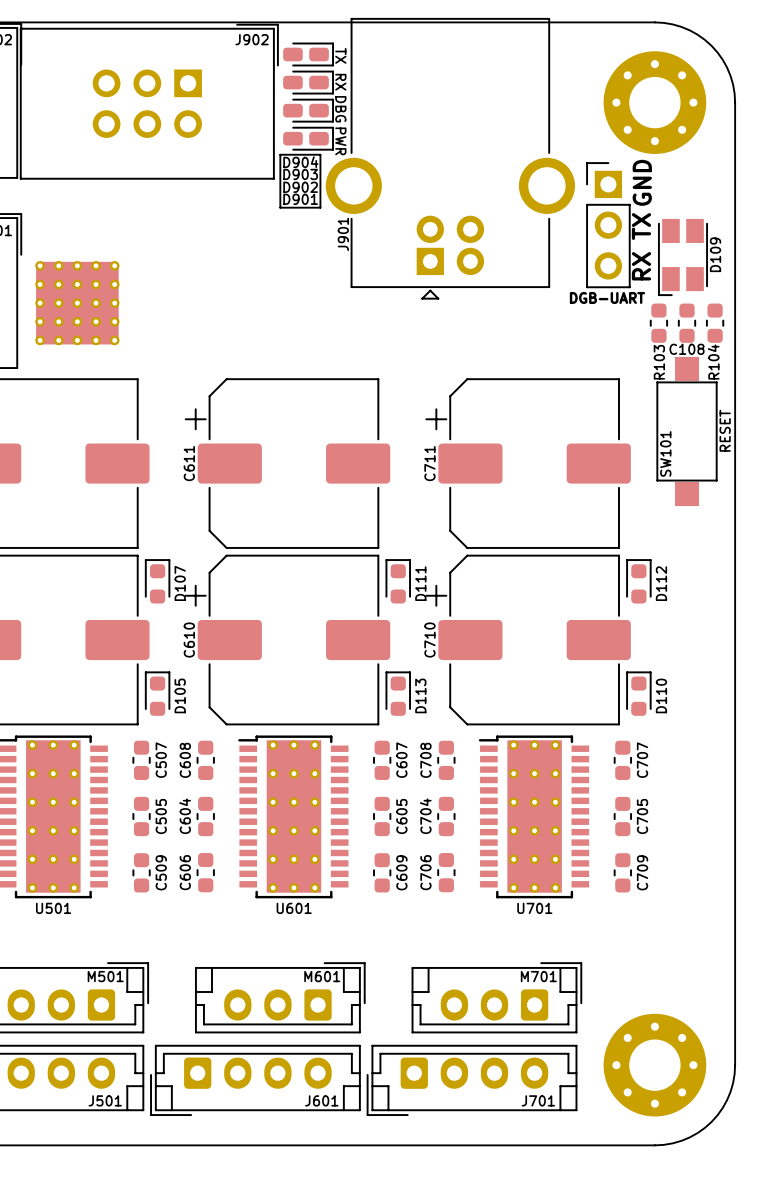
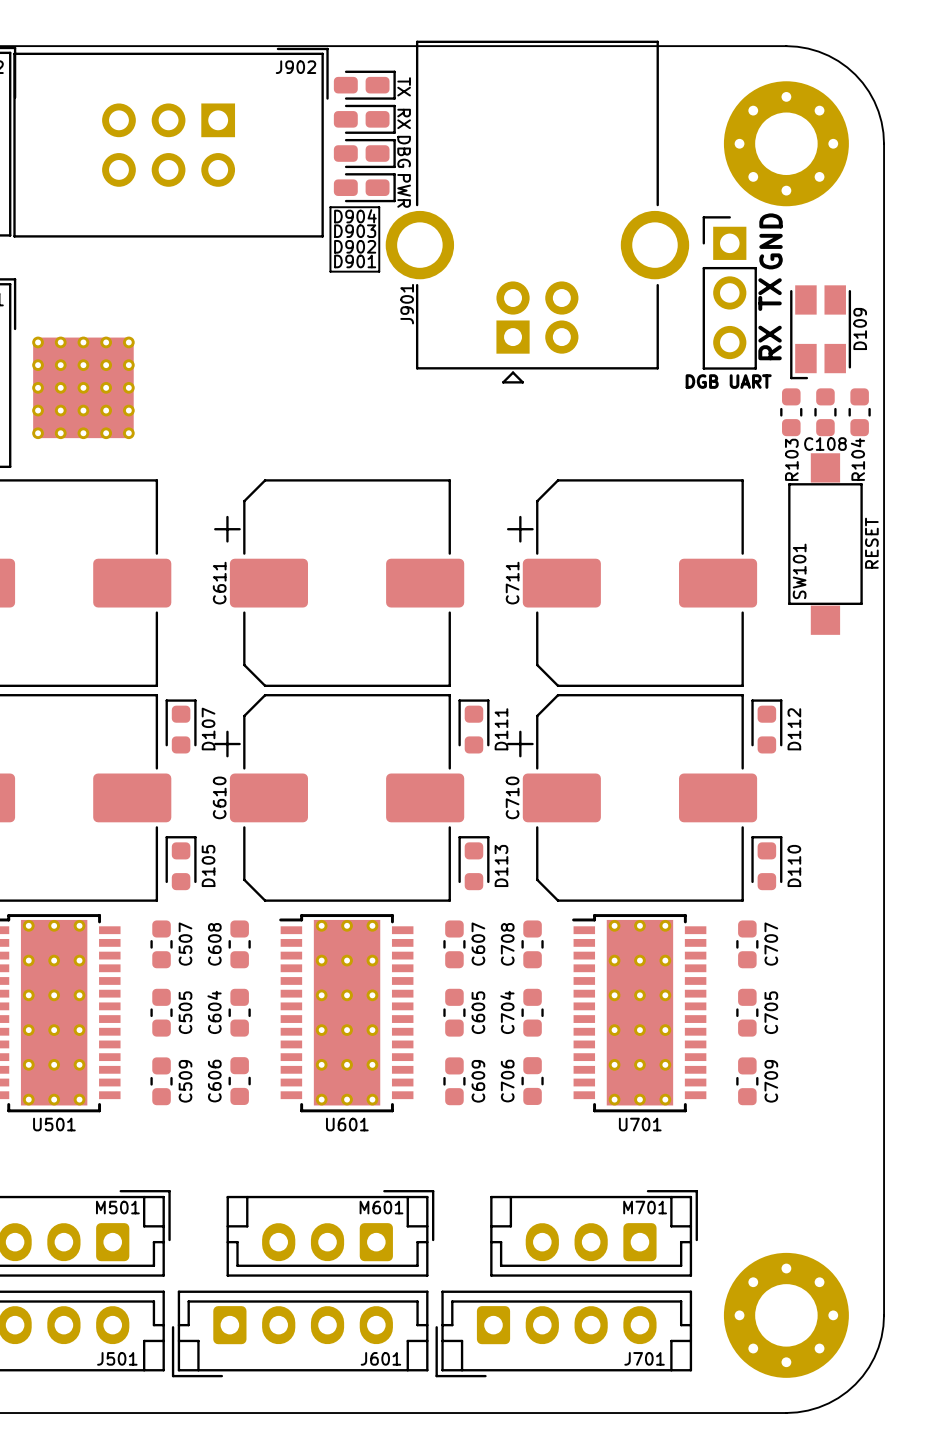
text: DGB-UART (607, 297) -> DGB UART (728, 381)

